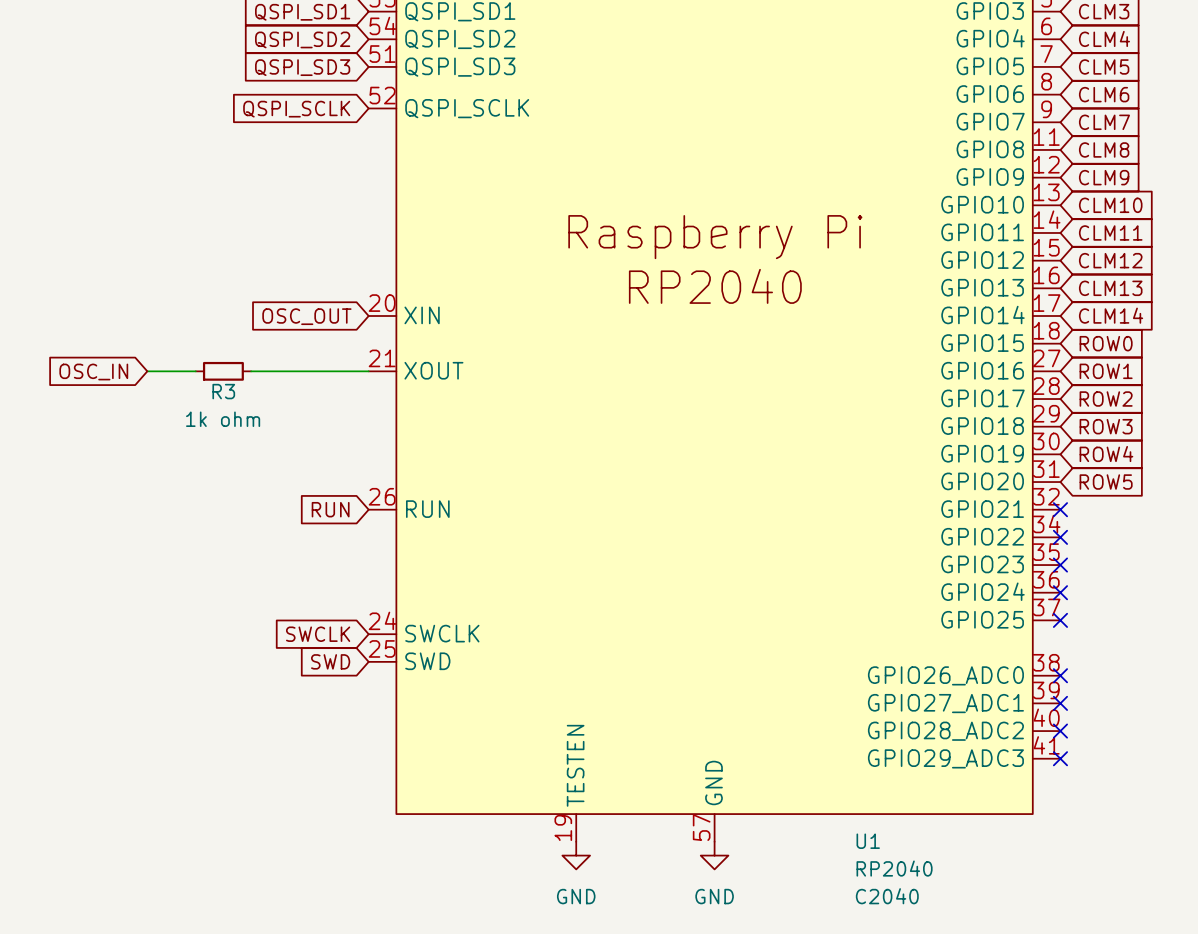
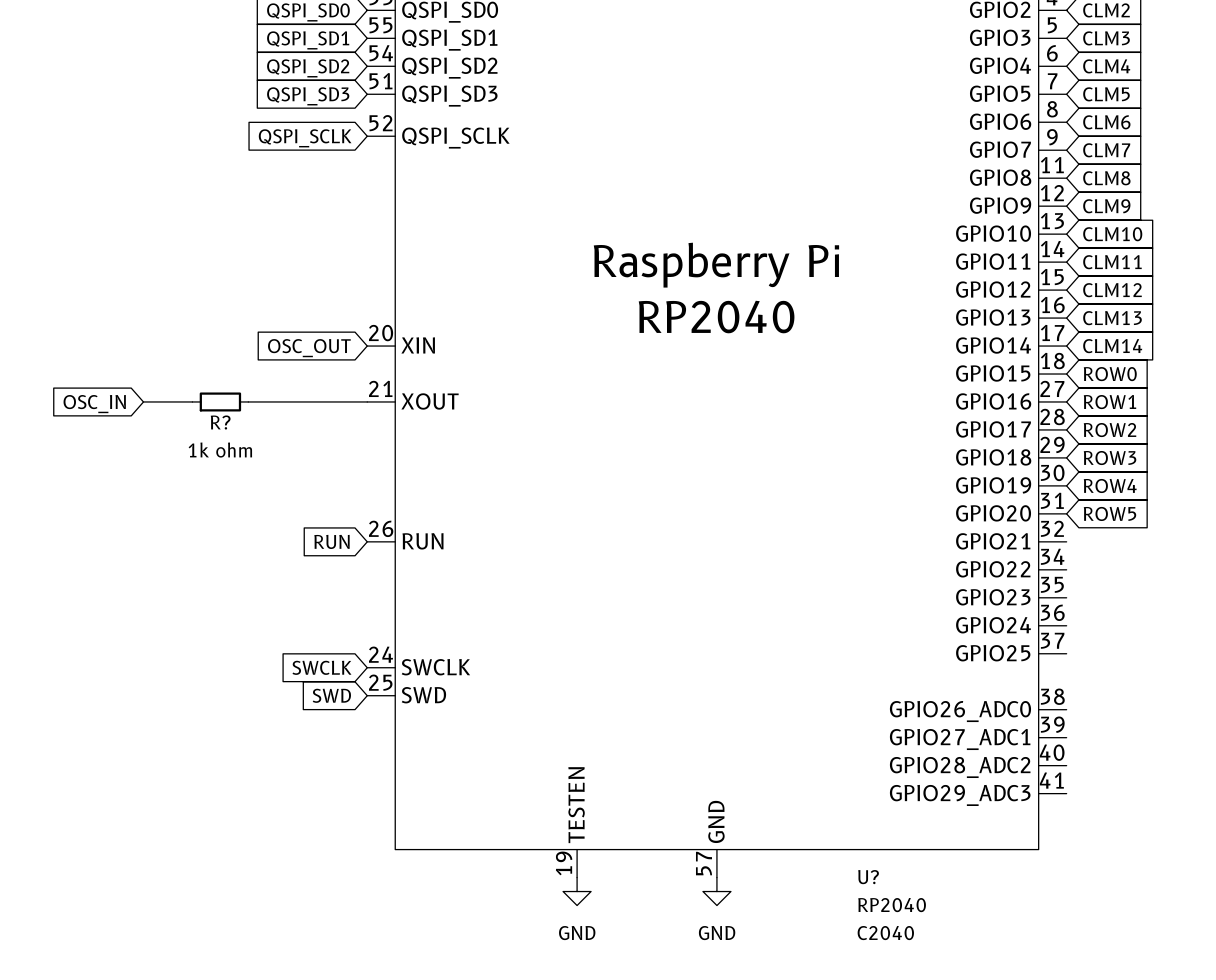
R3 name: R3 (223, 391) -> R? (220, 422)
no-connect mark: (1060, 509) -> none
no-connect mark: (1060, 537) -> none
no-connect mark: (1060, 565) -> none
no-connect mark: (1060, 592) -> none
no-connect mark: (1060, 620) -> none
no-connect mark: (1060, 675) -> none
no-connect mark: (1060, 703) -> none
no-connect mark: (1060, 731) -> none
no-connect mark: (1060, 758) -> none
U1 name: U1 (868, 841) -> U? (868, 877)

